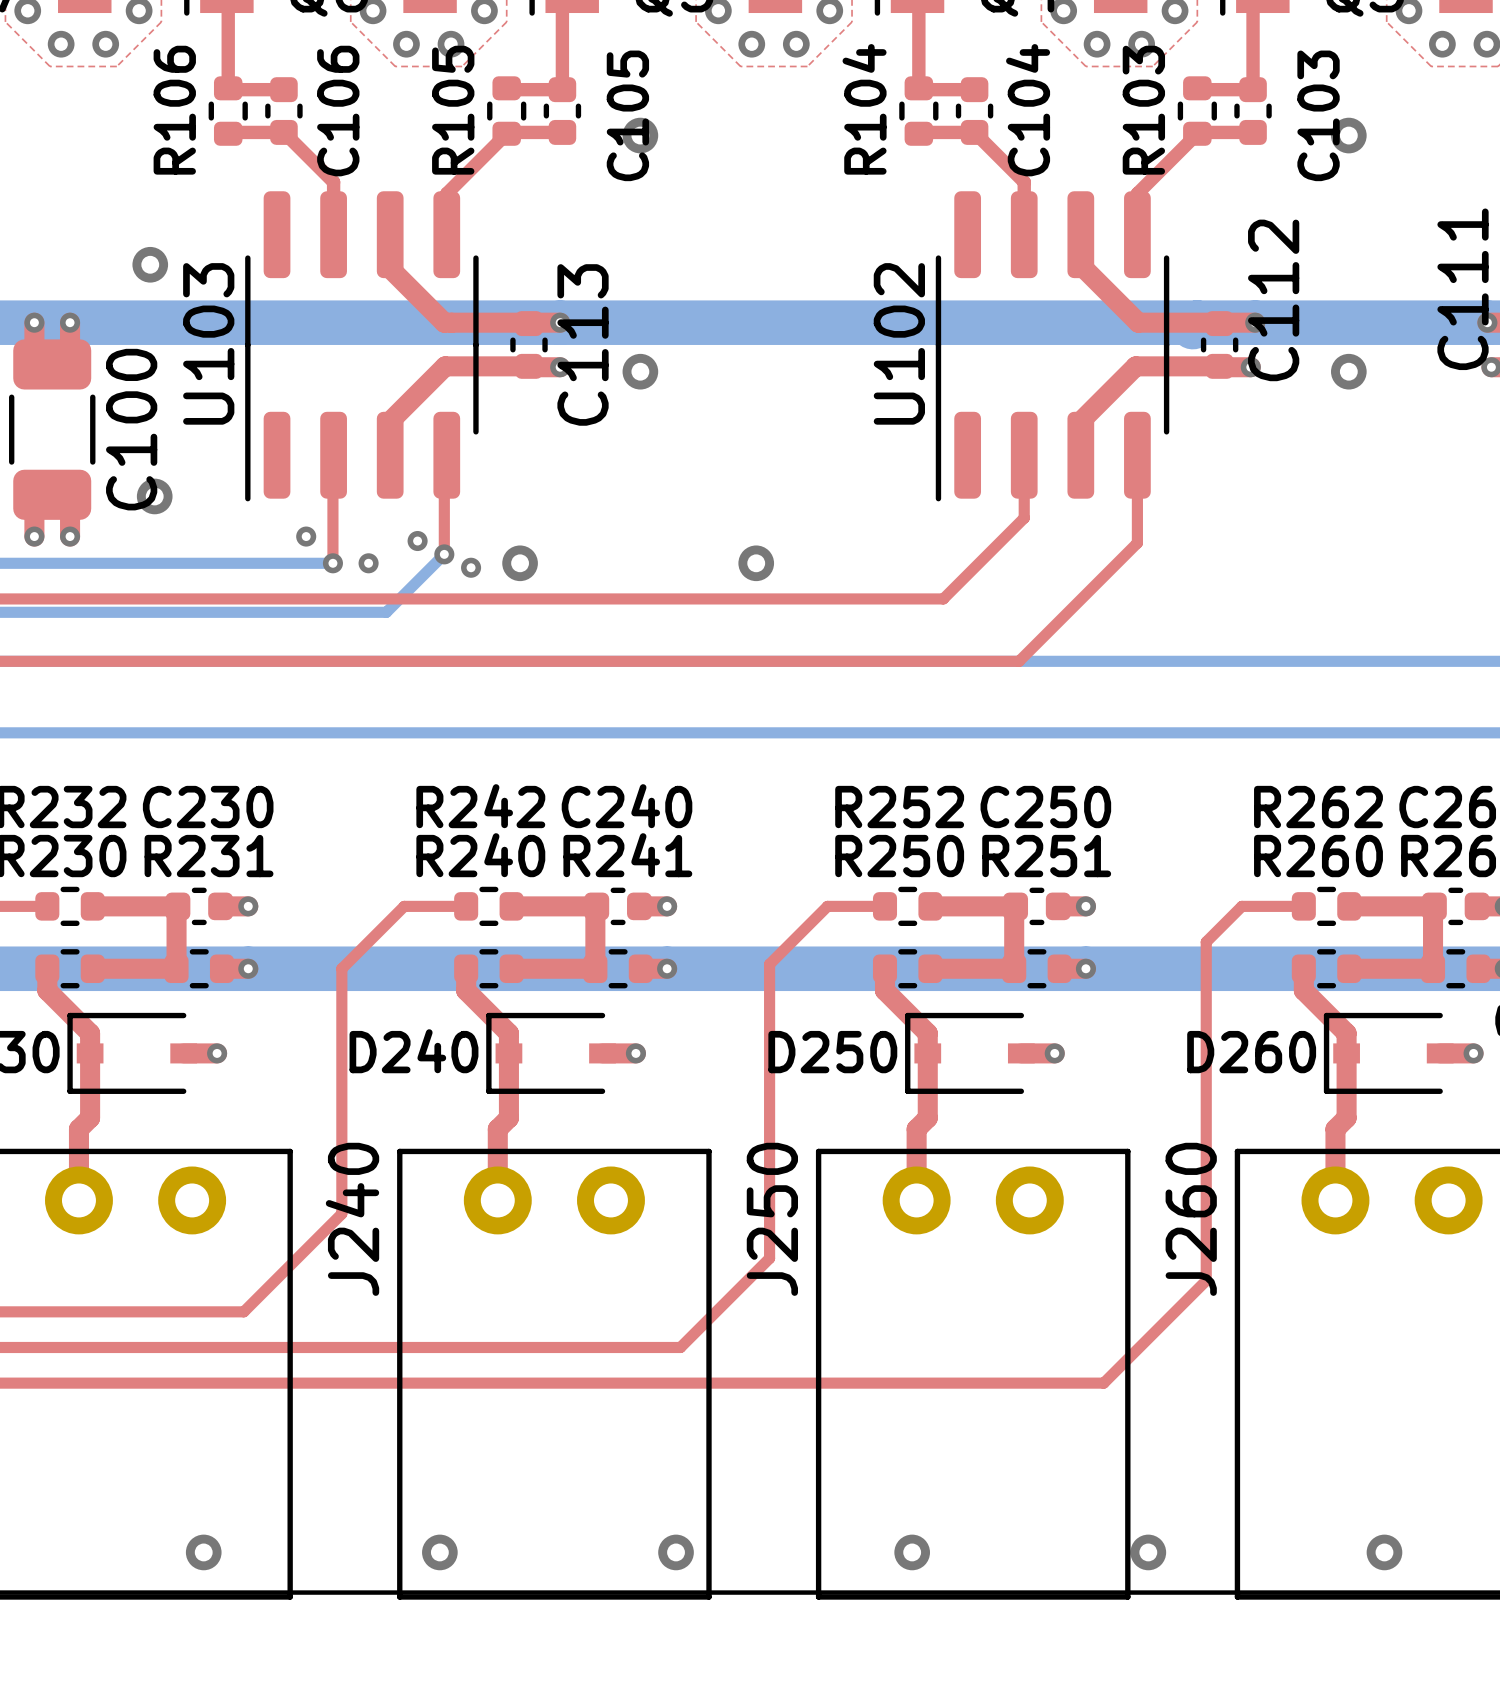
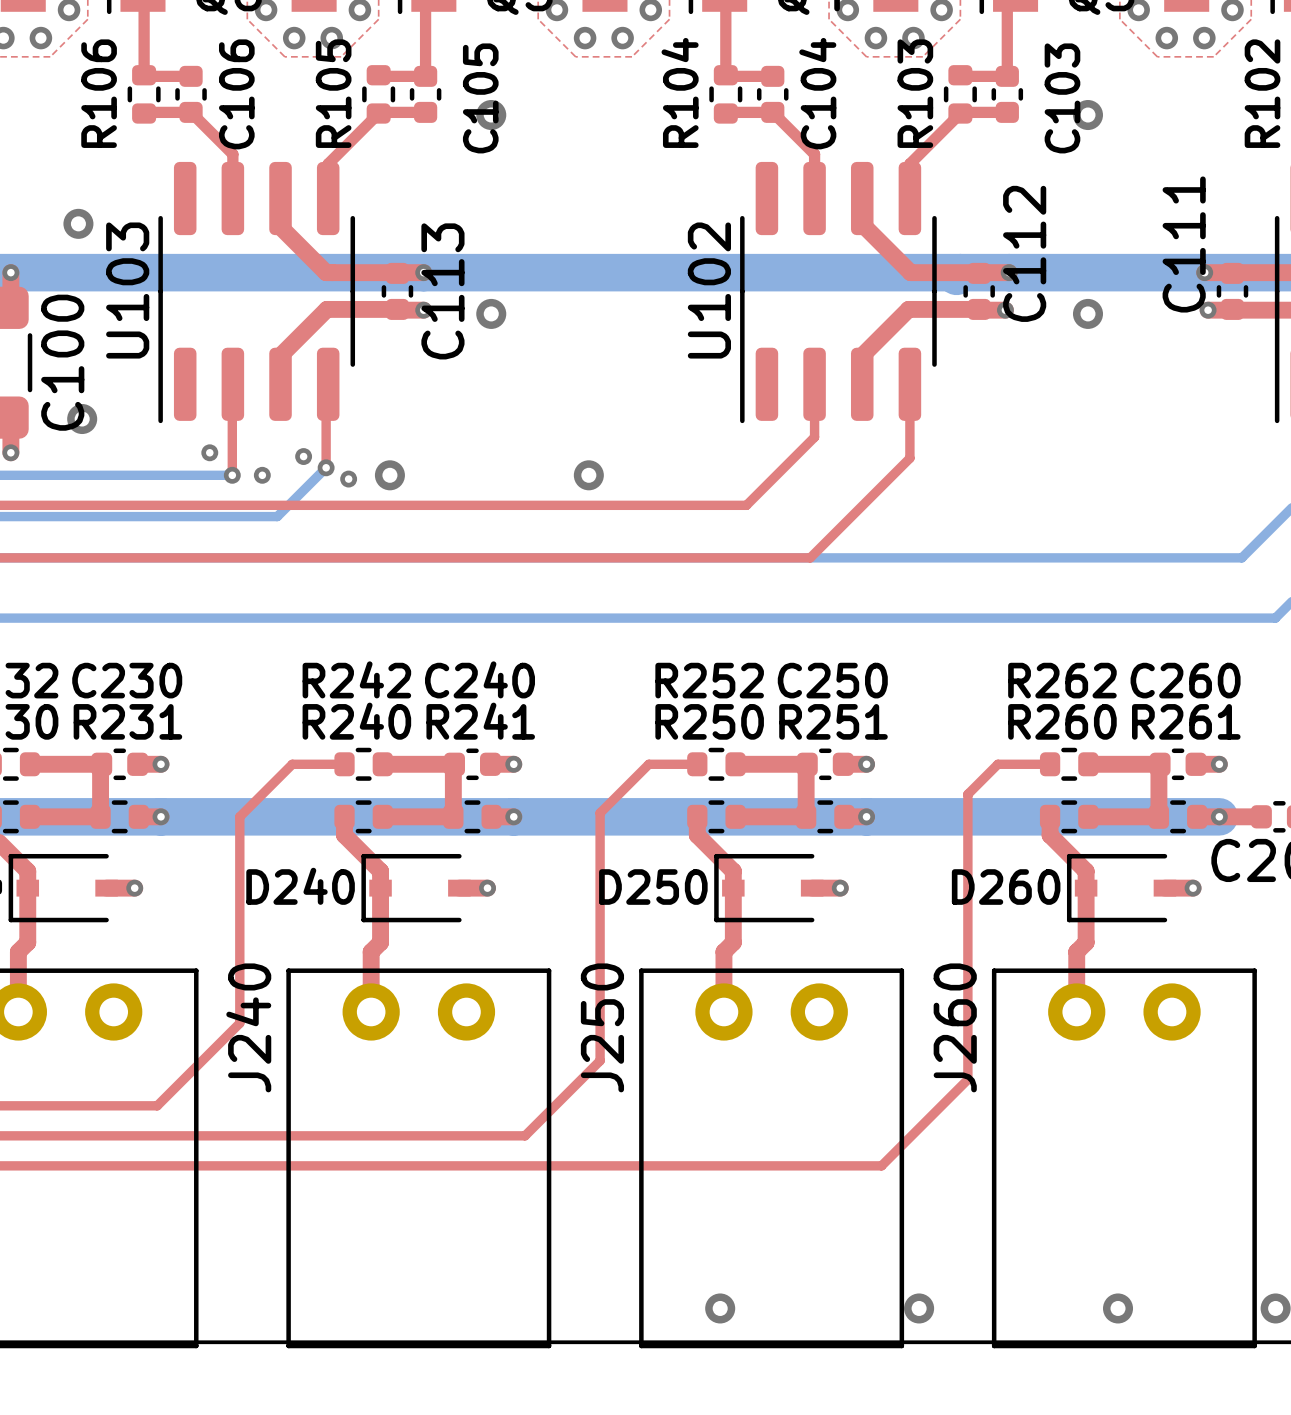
via: (203, 1552) -> none
via: (439, 1552) -> none
via: (676, 1552) -> none

